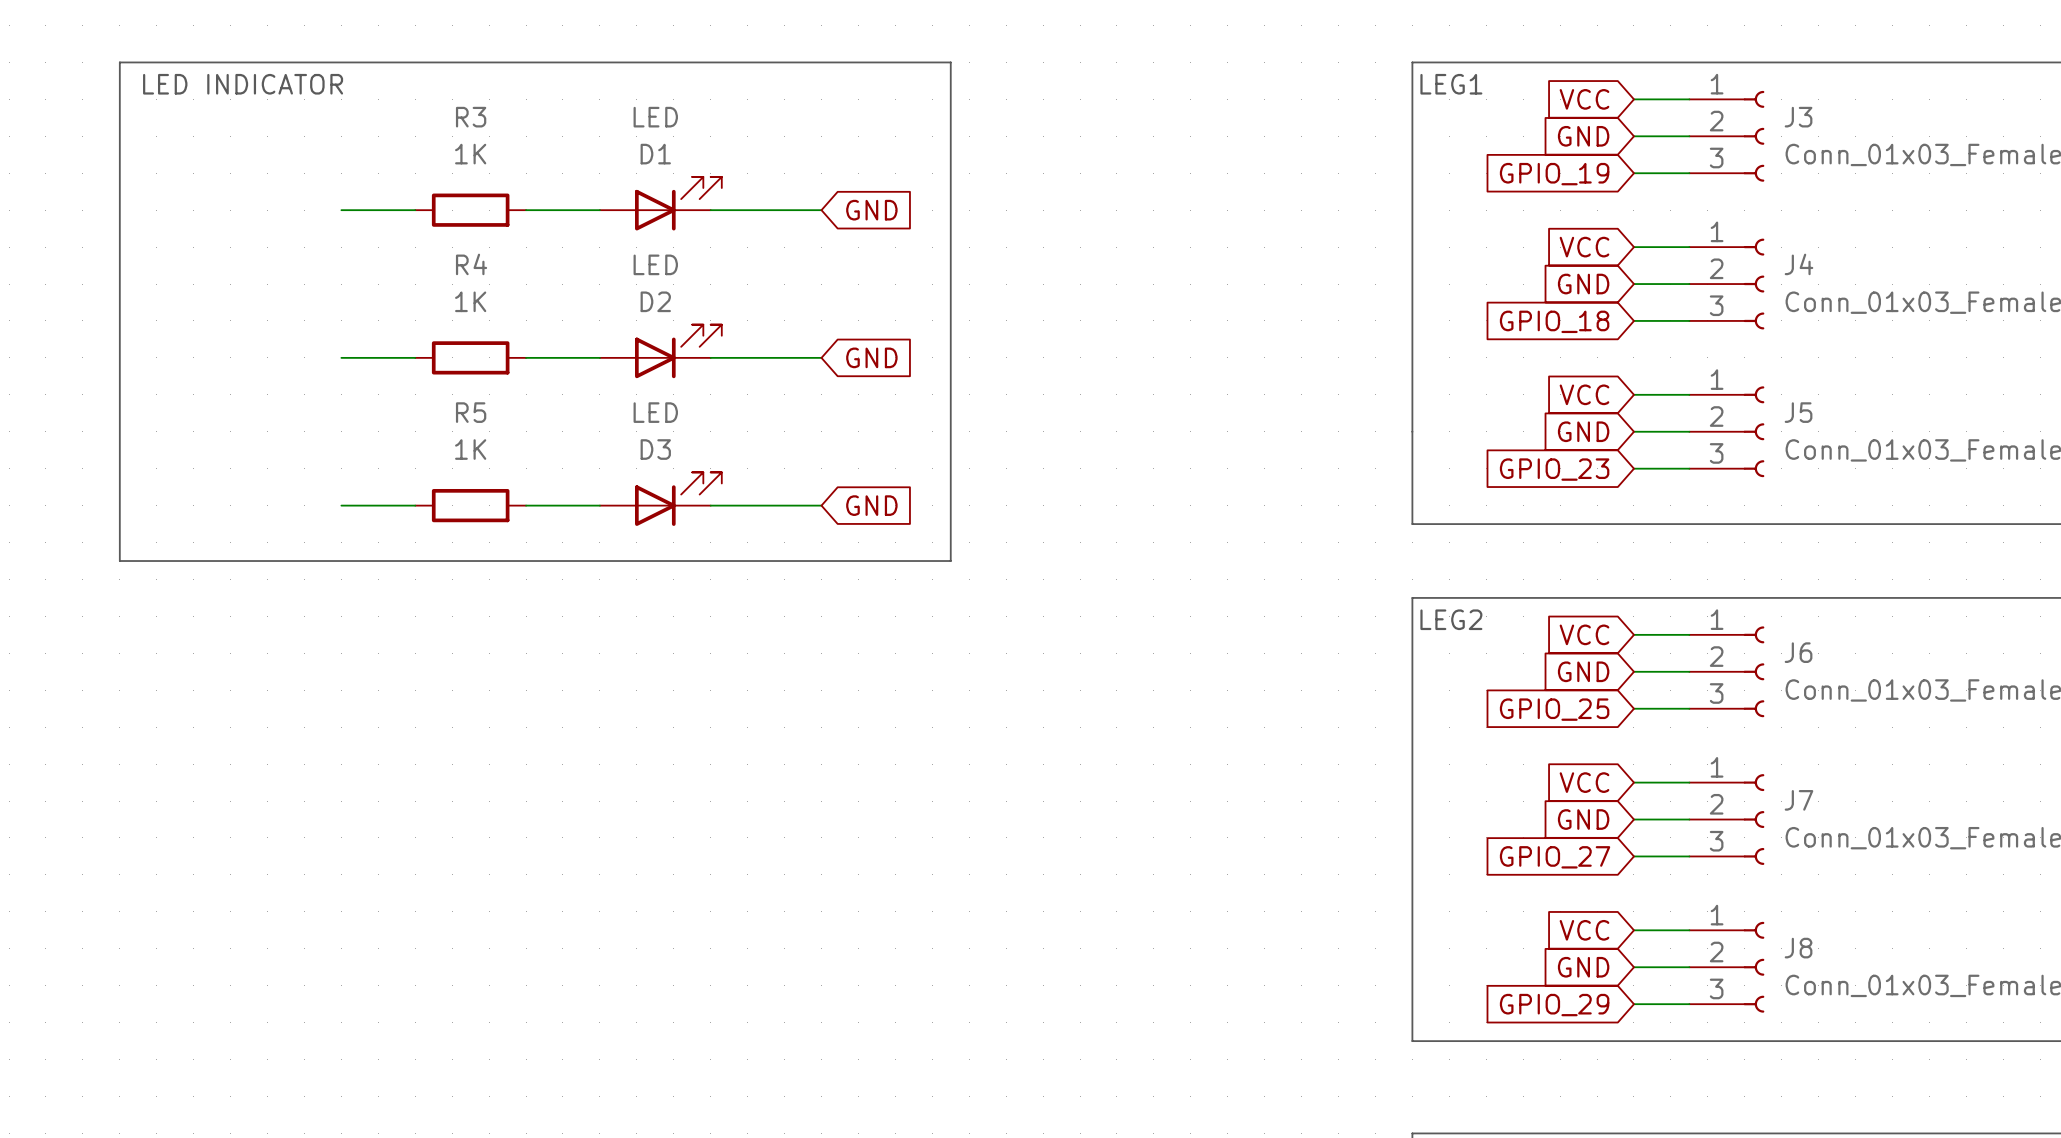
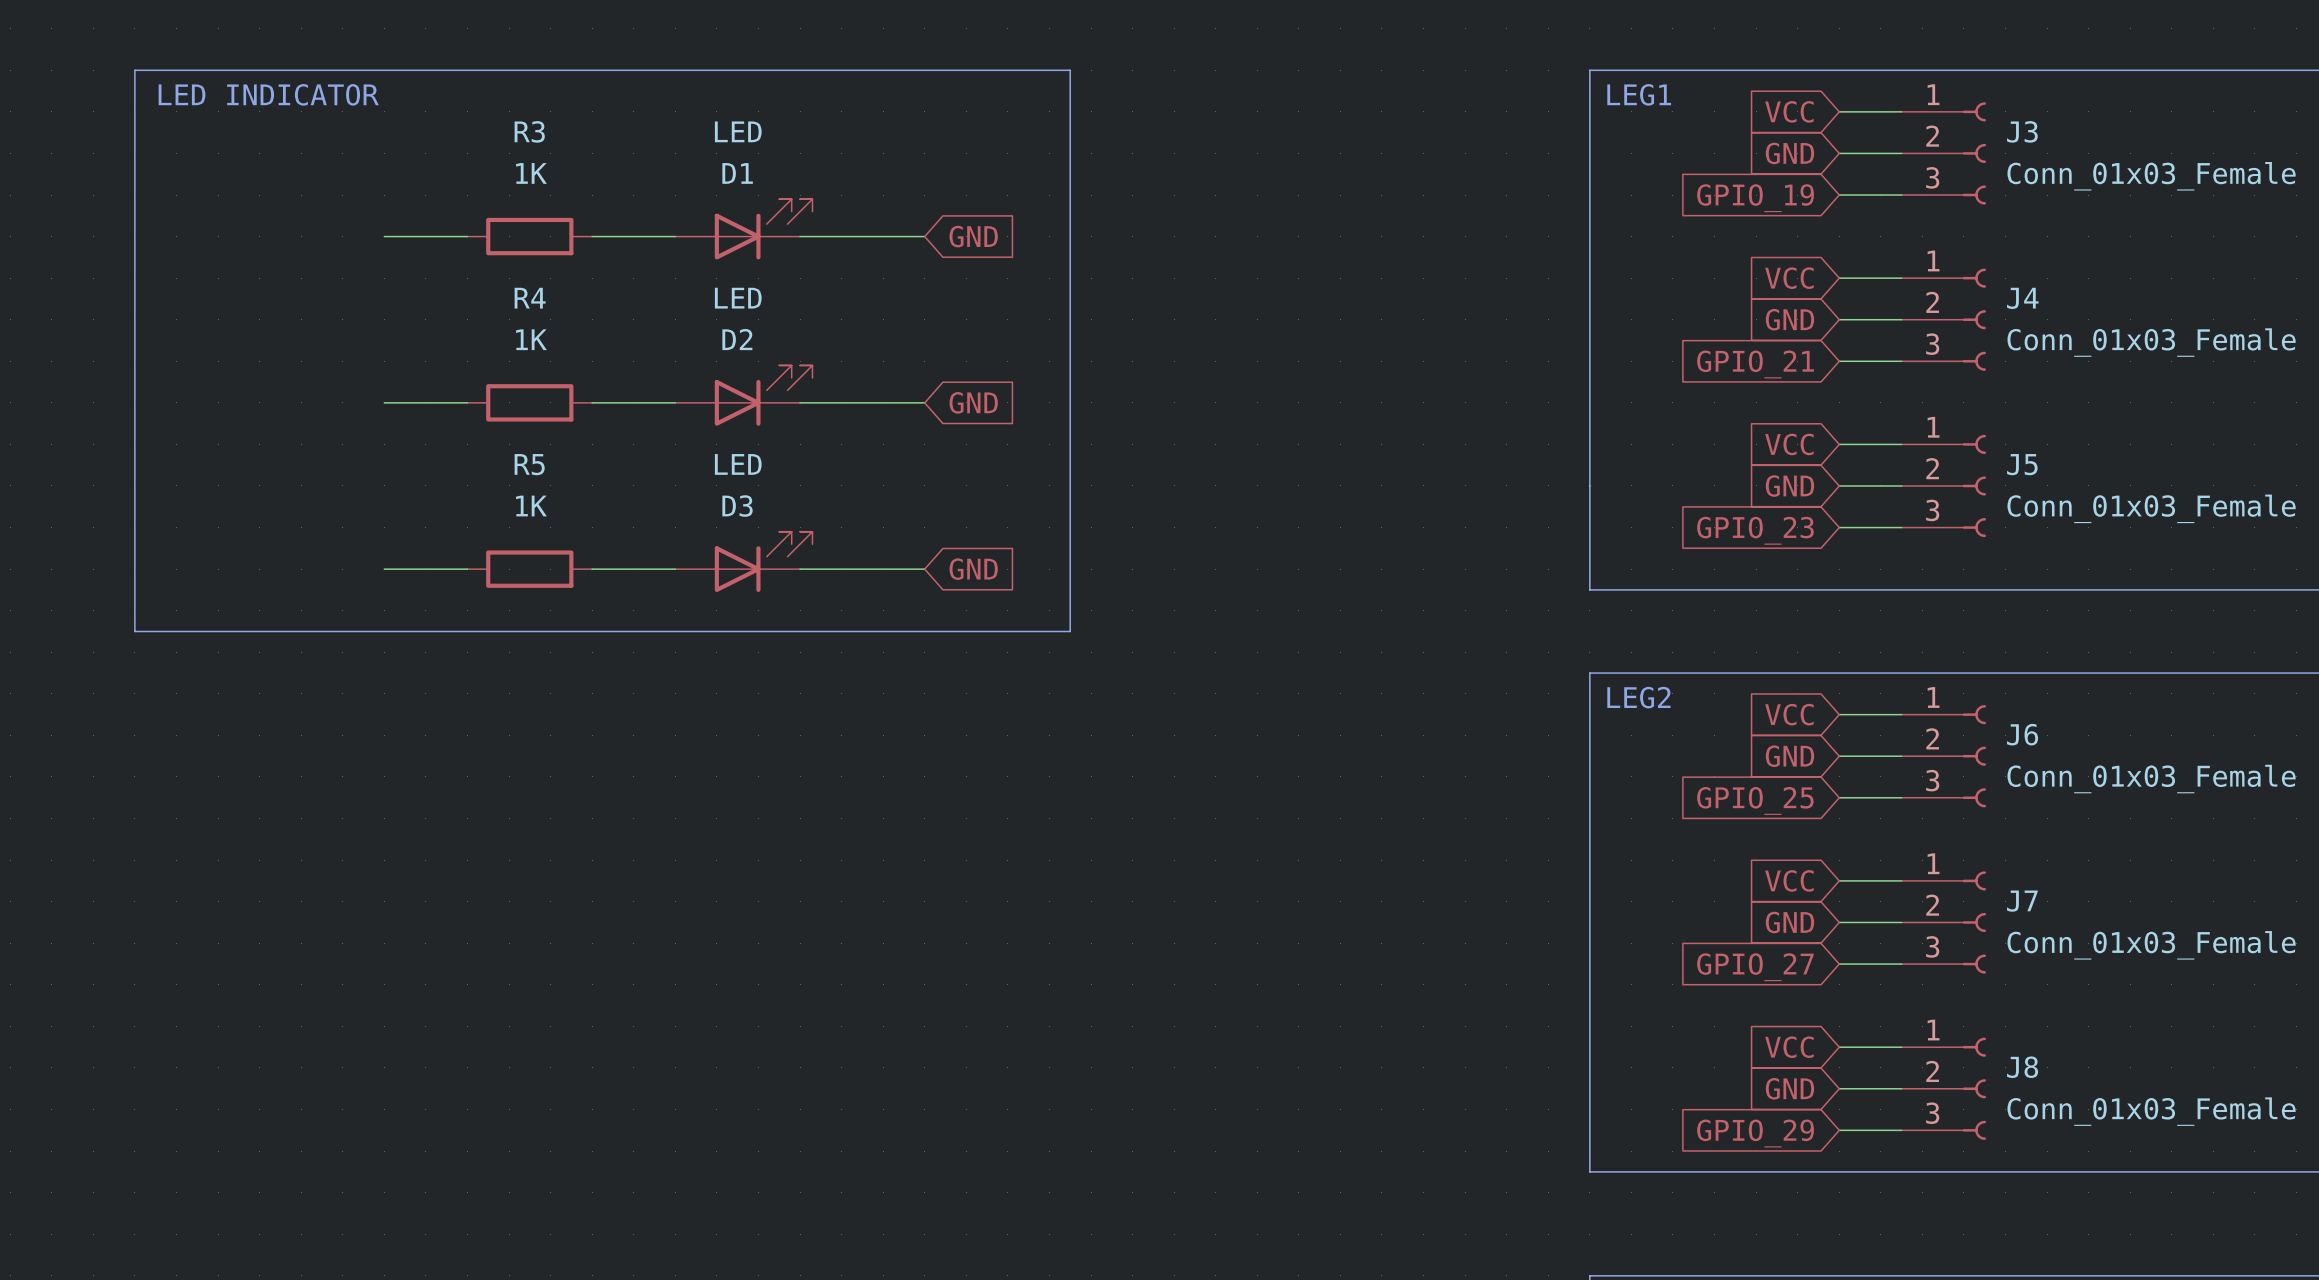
global label: GPIO_18 (1554, 321) -> GPIO_21 (1755, 364)

